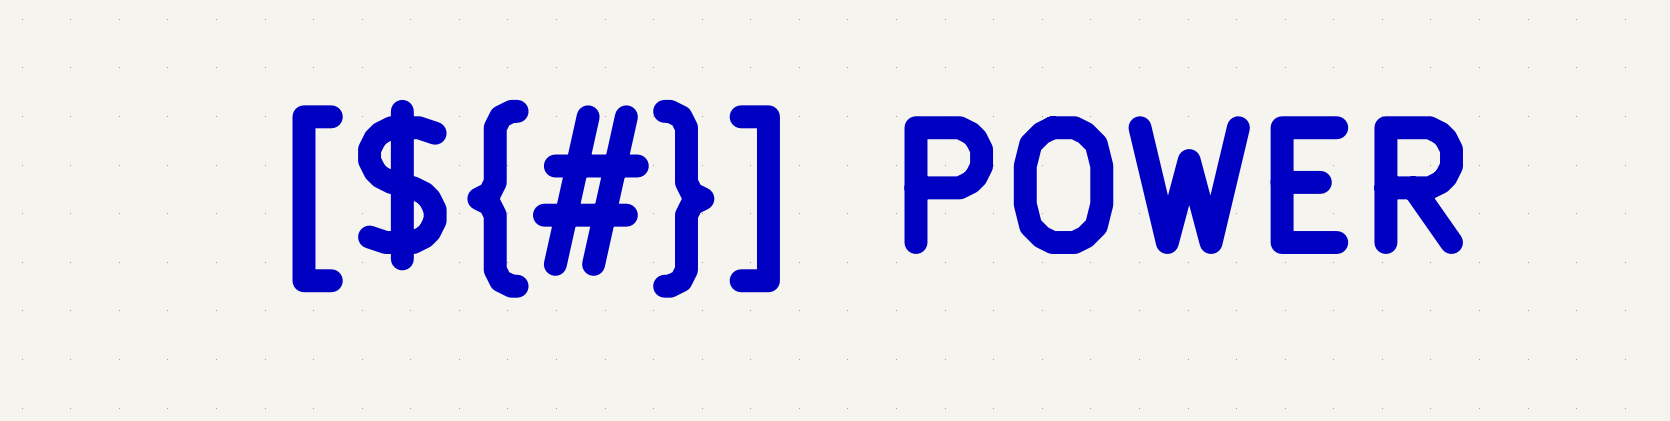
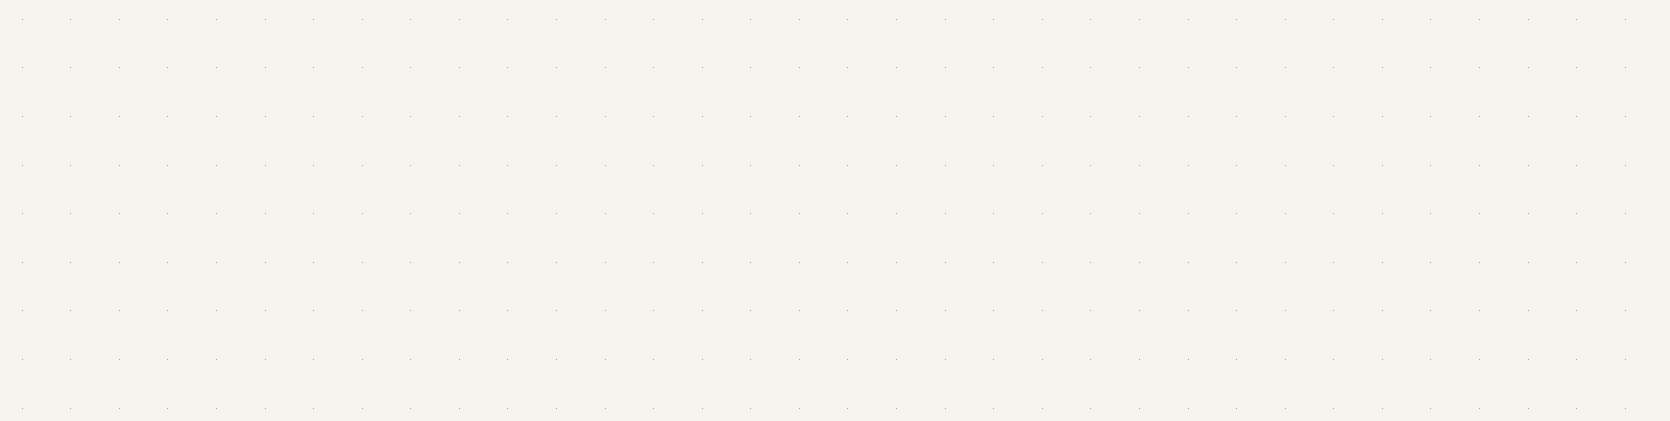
text: [${#}] POWER (877, 198) -> none

